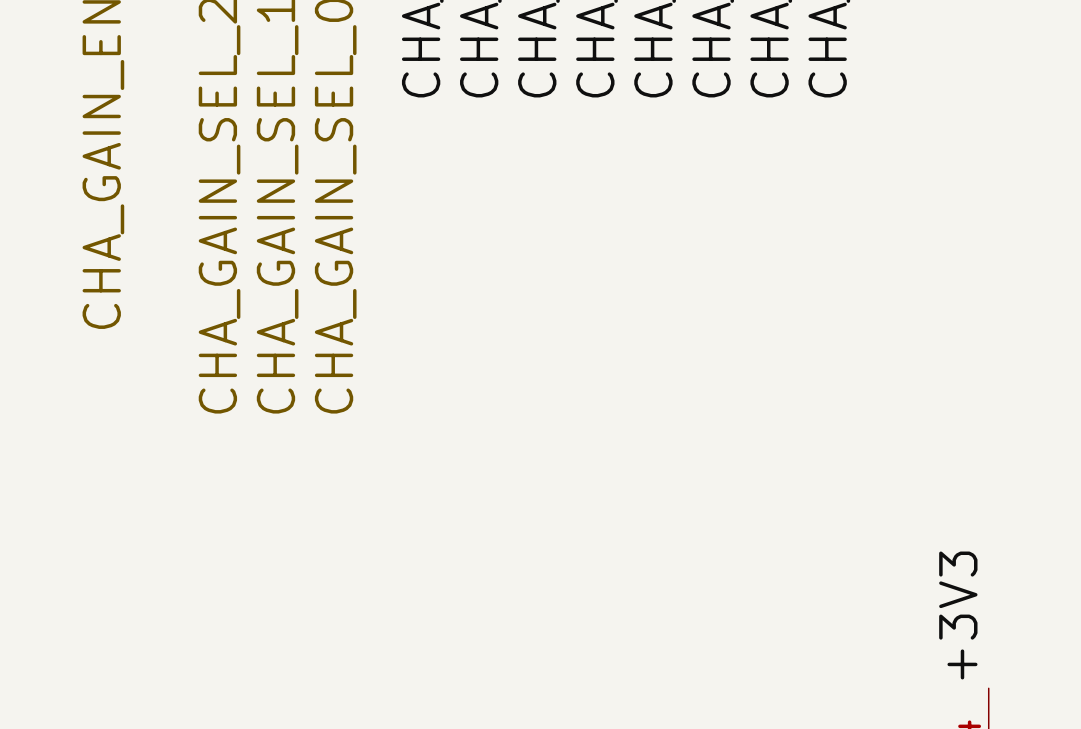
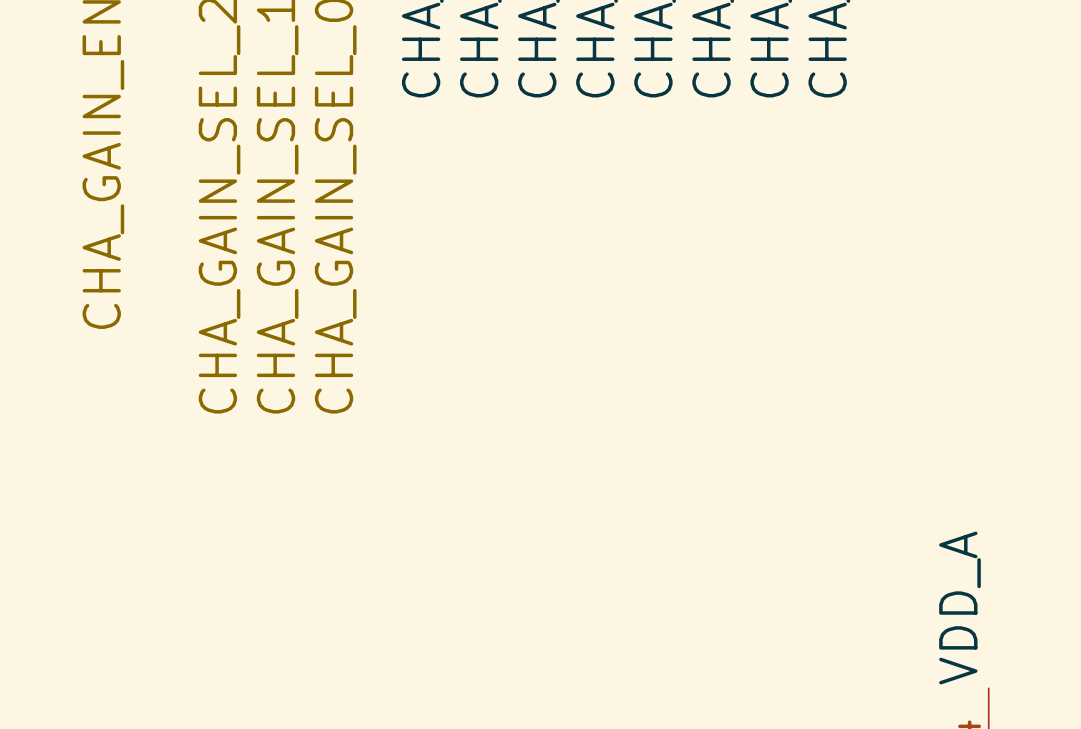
label: +3V3 (958, 615) -> VDD_A (959, 608)

